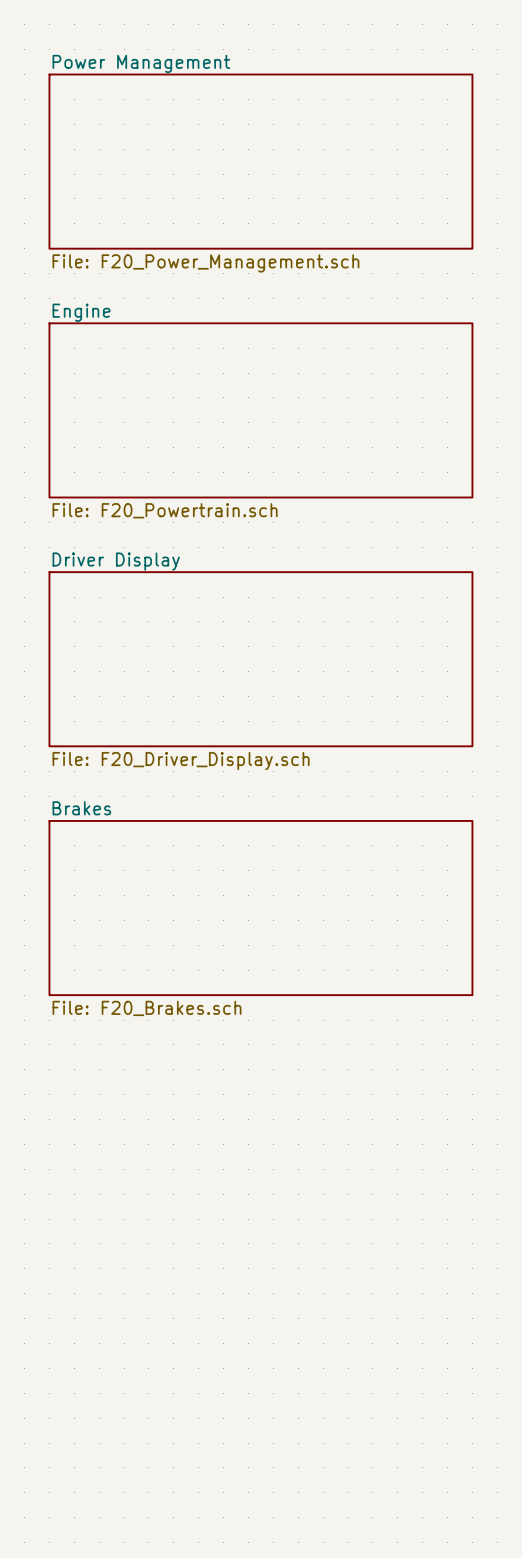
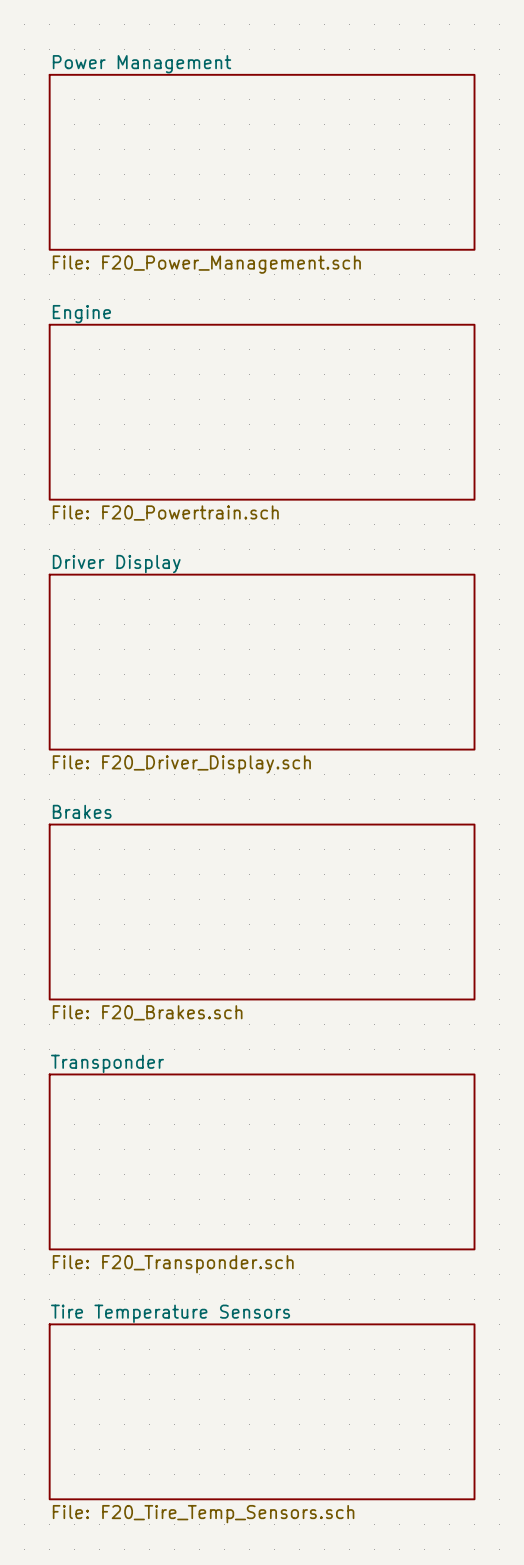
sheet Transponder: none -> File: F20_Transponder.sch (262, 1161)
sheet Tire Temperature Sensors: none -> File: F20_Tire_Temp_Sensors.sch (262, 1411)

